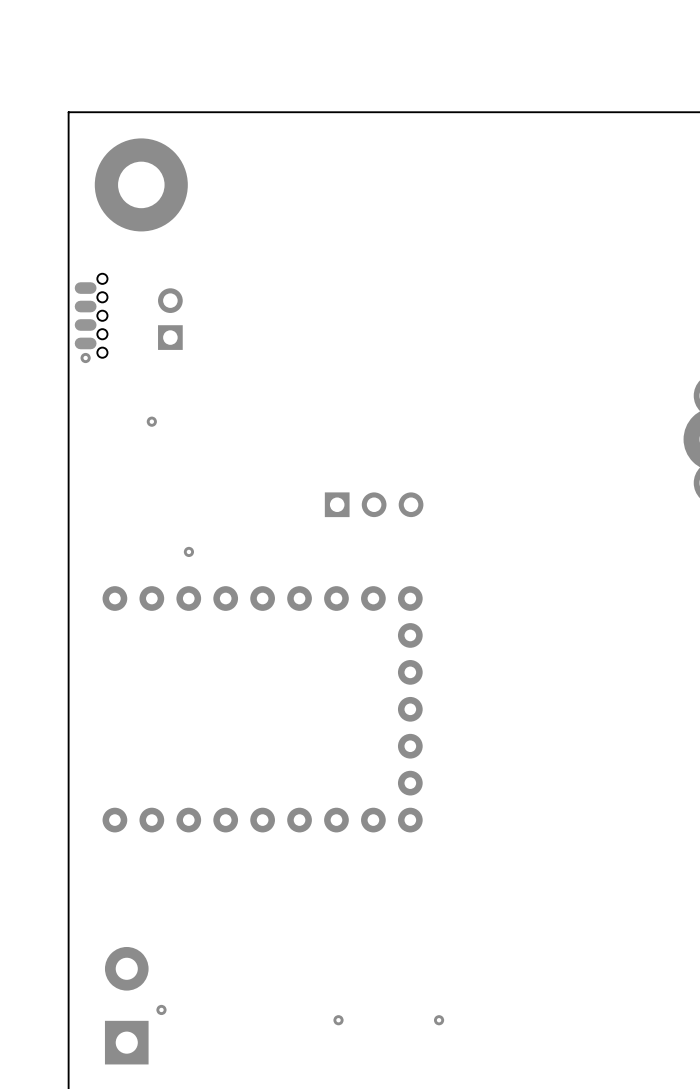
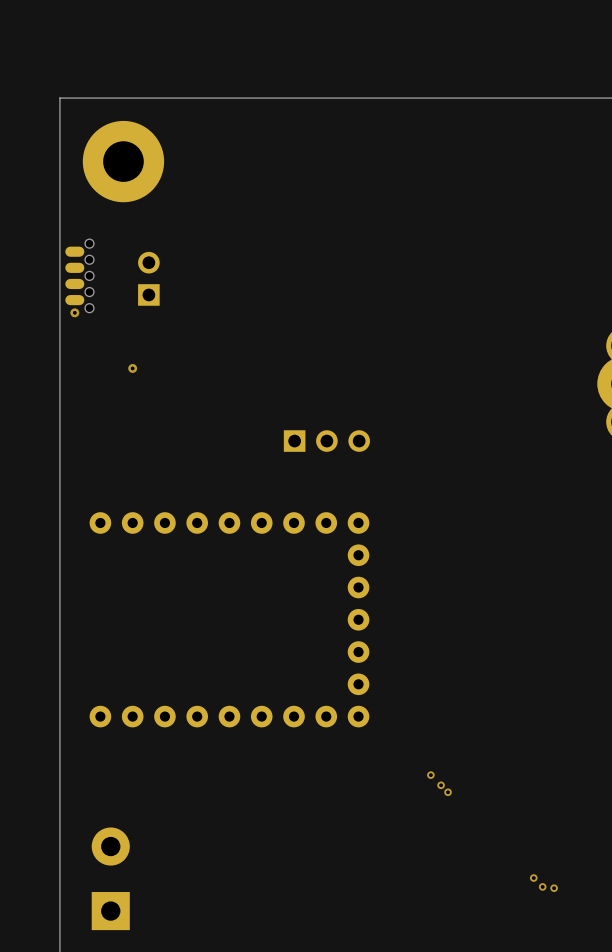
via: (188, 551) -> none
via: none -> (430, 775)
via: none -> (441, 785)
via: none -> (448, 792)
via: none -> (533, 878)
via: (161, 1009) -> none
via: none -> (542, 886)
via: none -> (554, 888)
via: (338, 1020) -> none
via: (439, 1020) -> none

